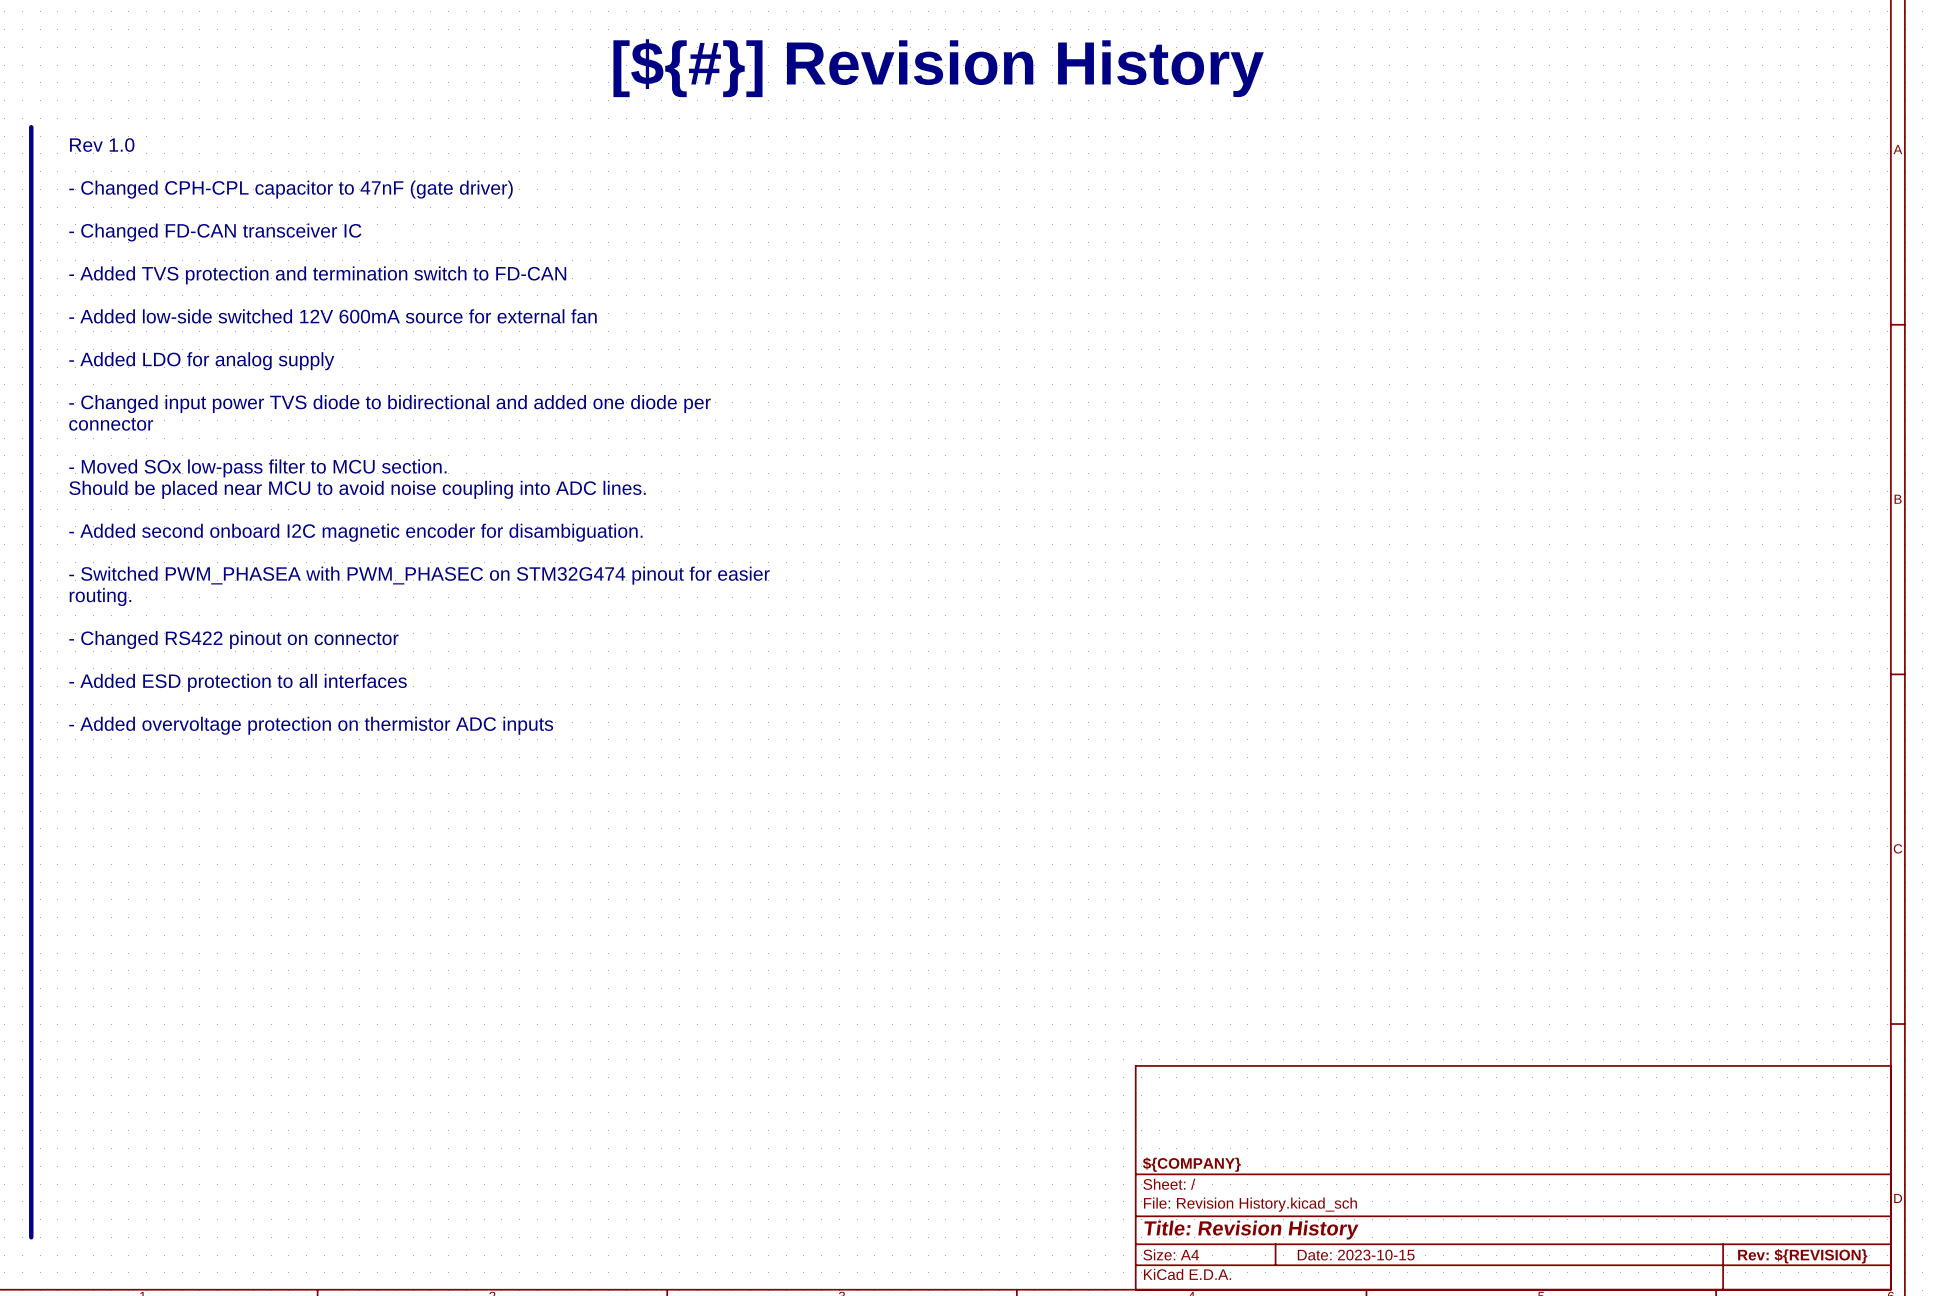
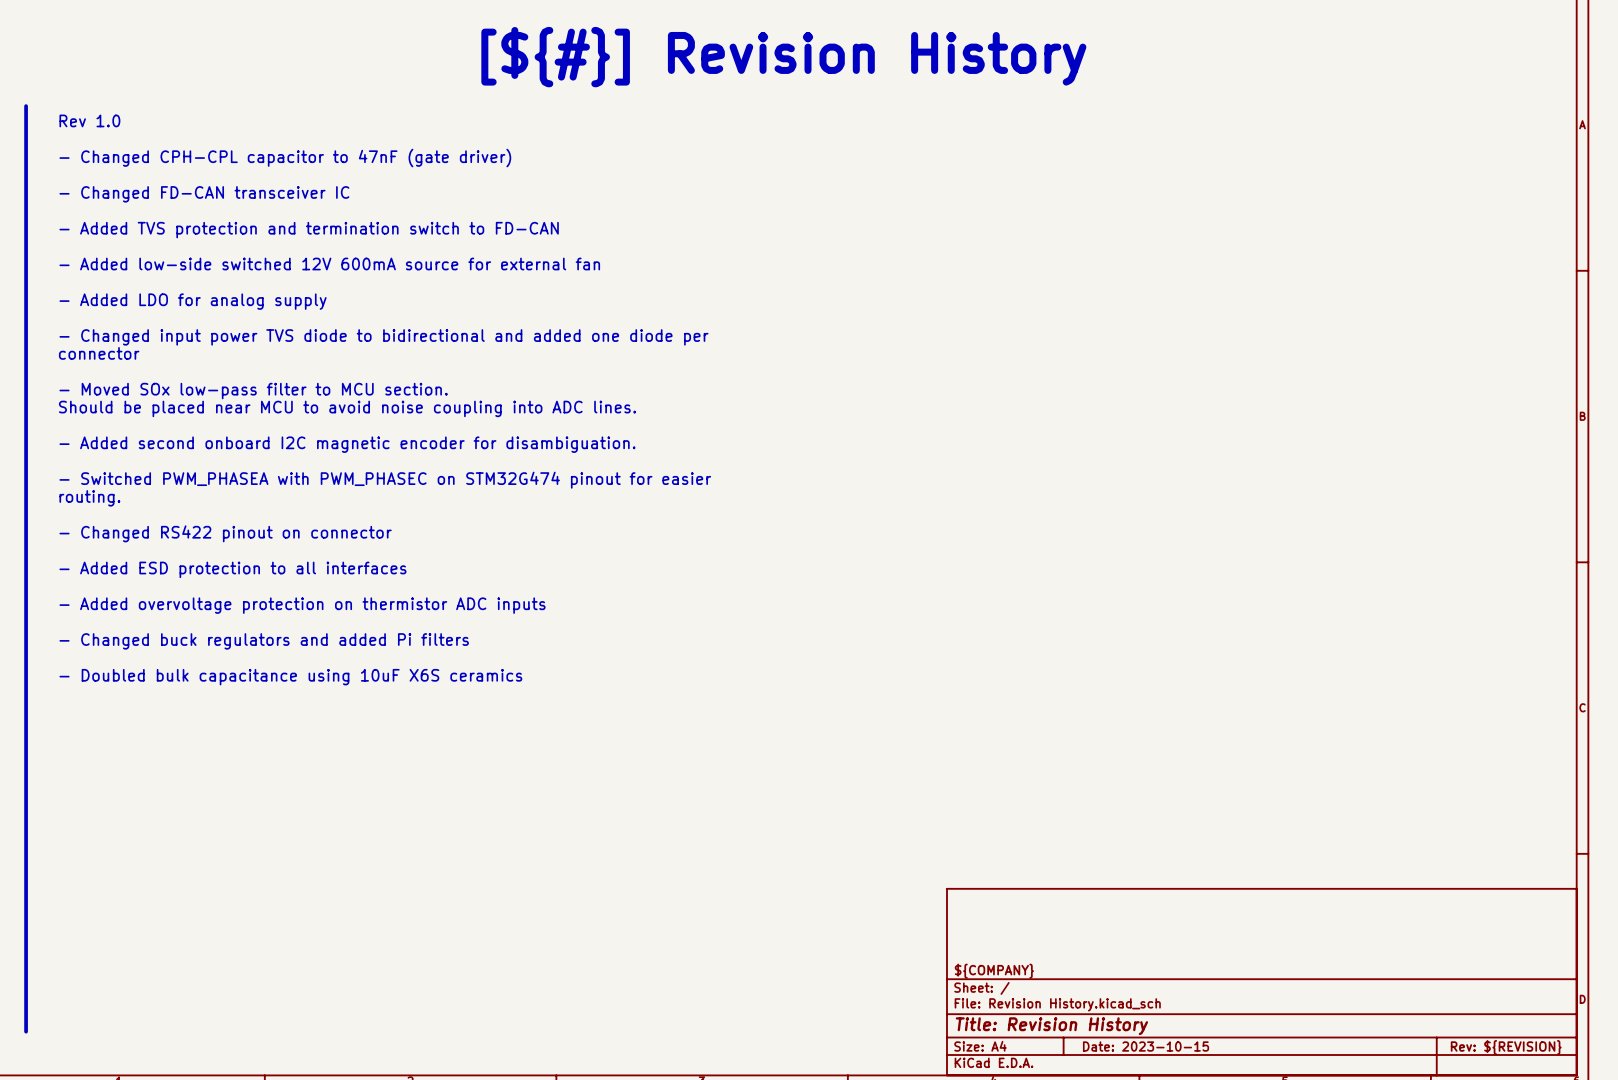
text: none -> - Changed buck regulators and added Pi filters (264, 641)
text: none -> - Doubled bulk capacitance using 10uF X6S ceramics (290, 677)

